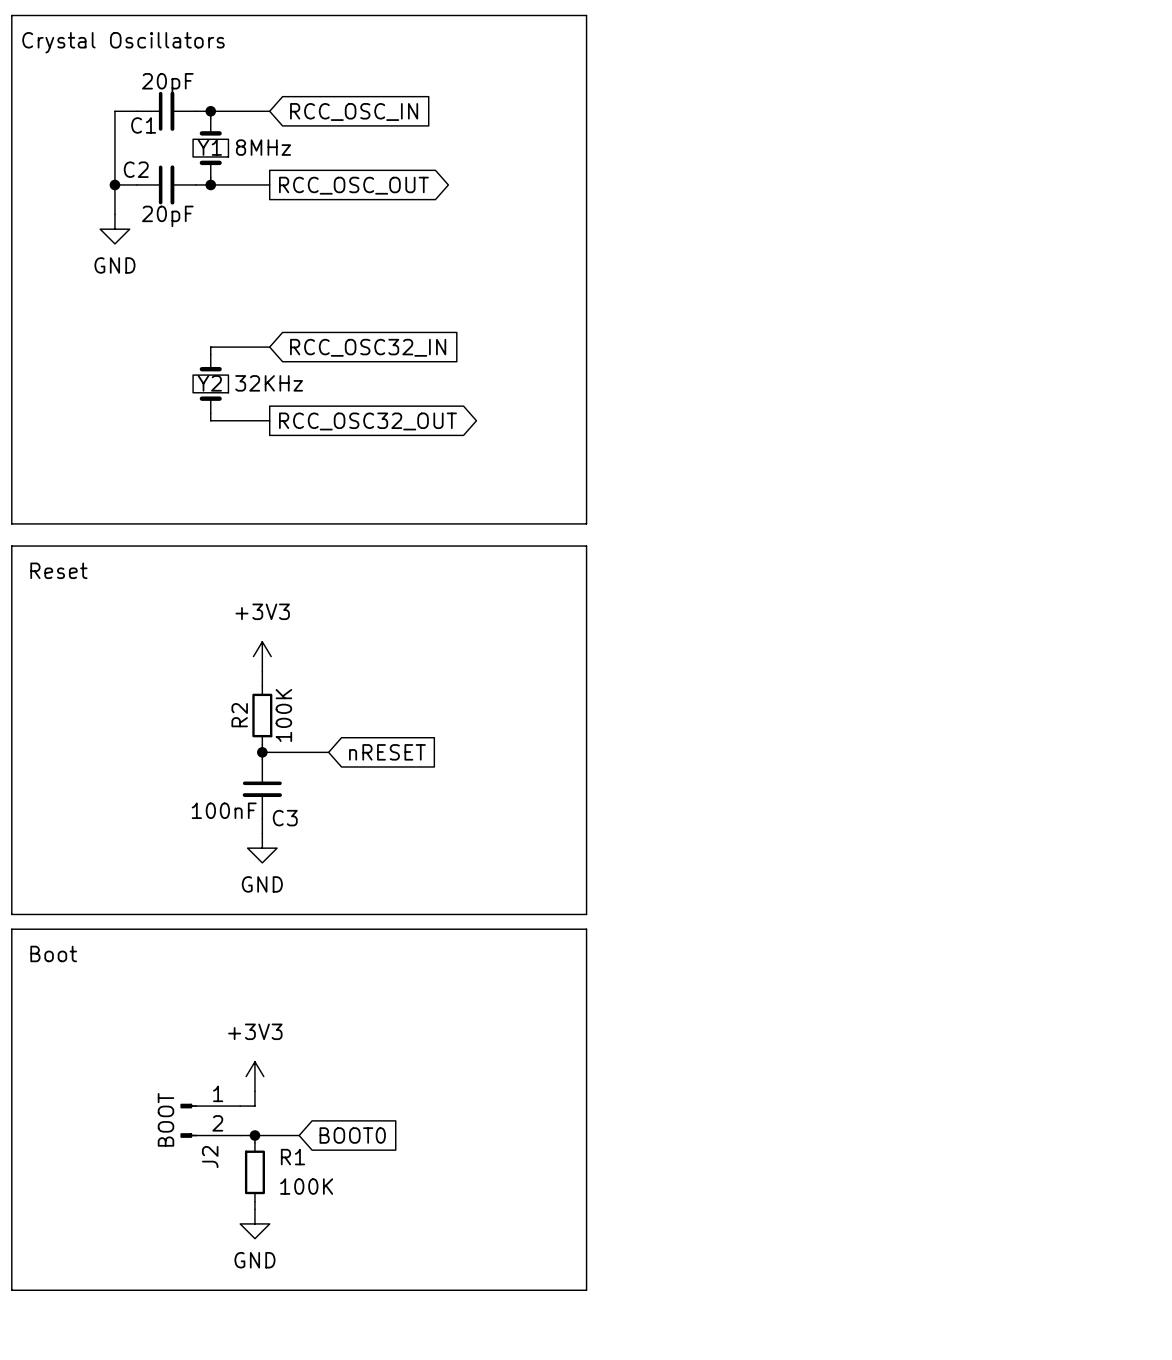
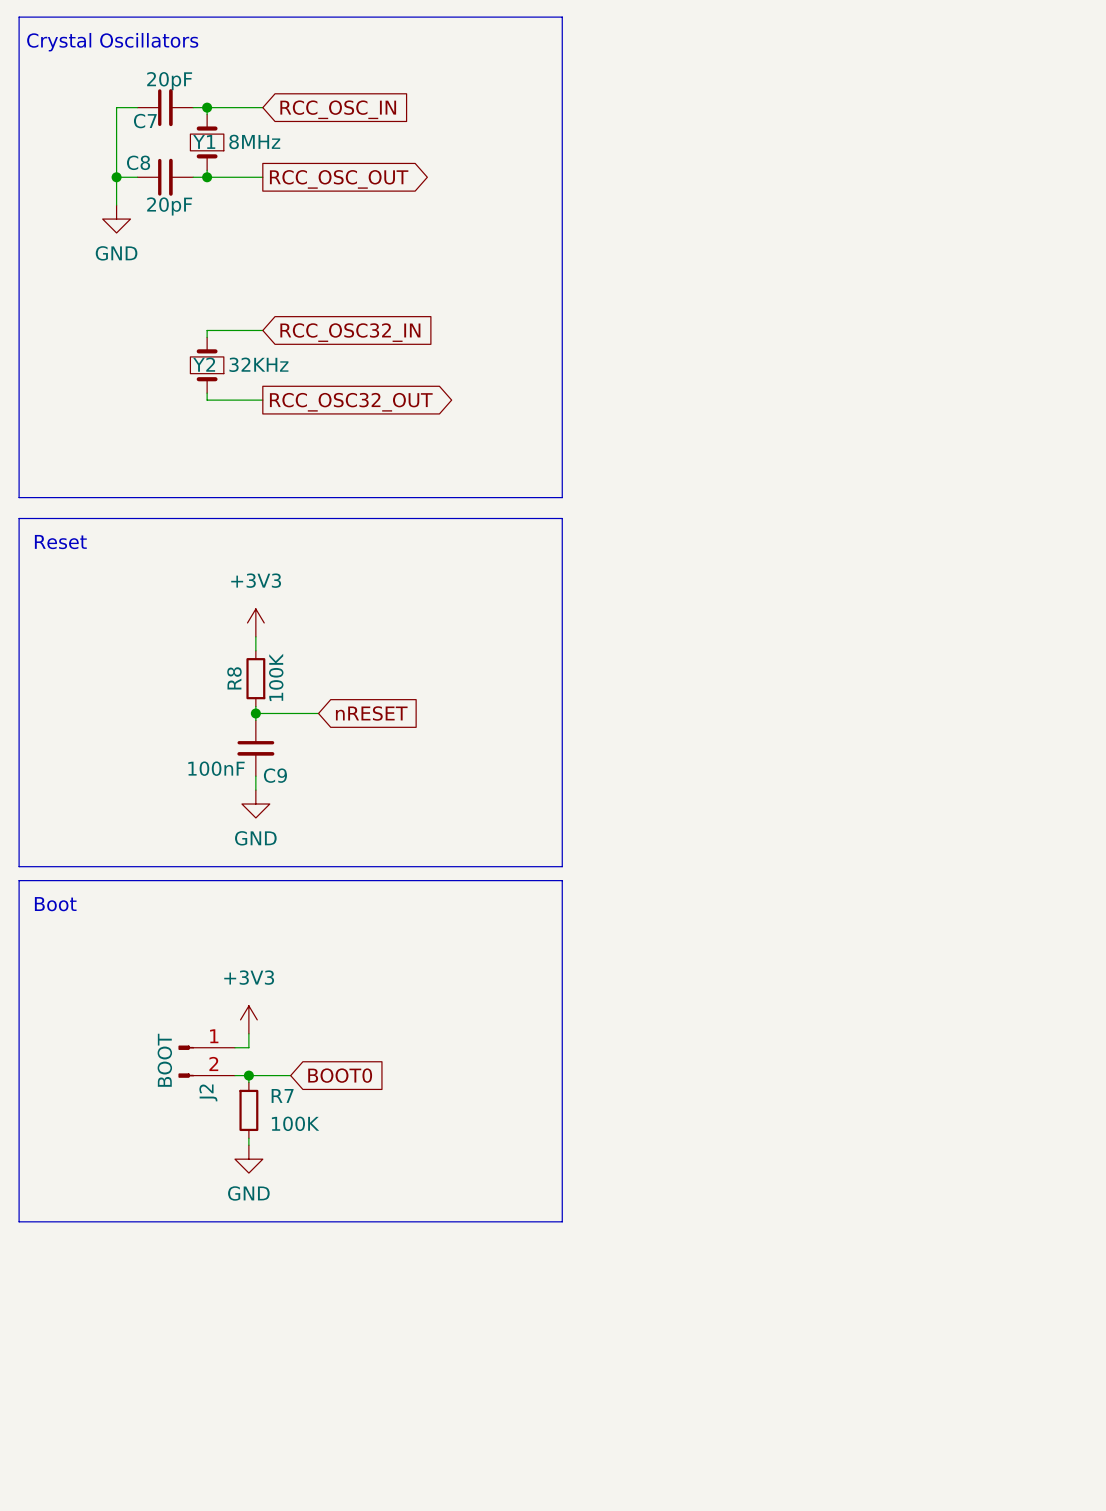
C1 name: C1 (143, 125) -> C7 (145, 121)
C2 name: C2 (136, 169) -> C8 (138, 162)
R2 name: R2 (239, 715) -> R8 (234, 678)
C3 name: C3 (285, 818) -> C9 (275, 775)
R1 name: R1 (292, 1157) -> R7 (282, 1095)

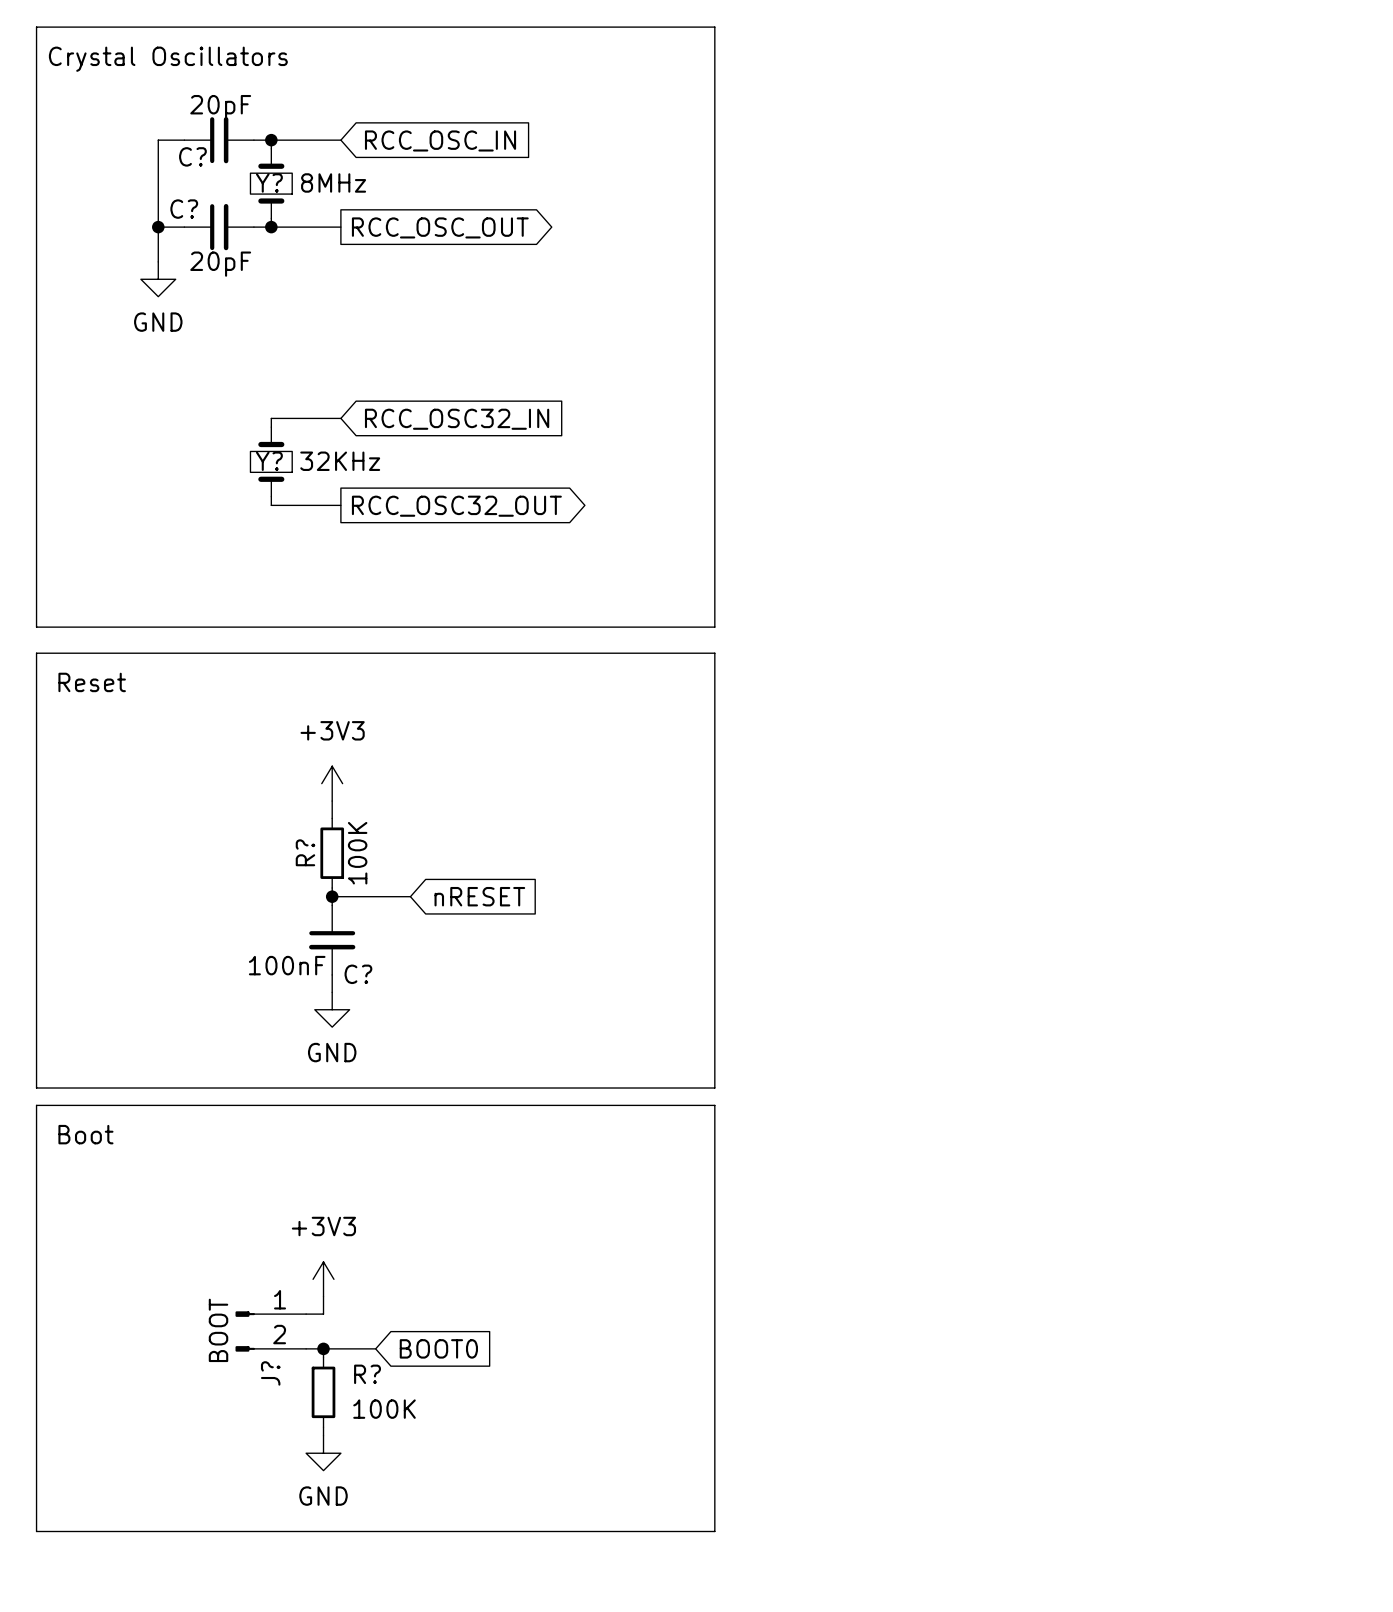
C7 name: C7 (145, 121) -> C? (192, 156)
Y1 name: Y1 (204, 141) -> Y? (269, 182)
C8 name: C8 (138, 162) -> C? (184, 209)
Y2 name: Y2 (204, 364) -> Y? (269, 461)
R8 name: R8 (234, 678) -> R? (305, 852)
C9 name: C9 (275, 775) -> C? (358, 974)
J2 name: J2 (208, 1092) -> J? (270, 1373)
R7 name: R7 (282, 1095) -> R? (367, 1374)

